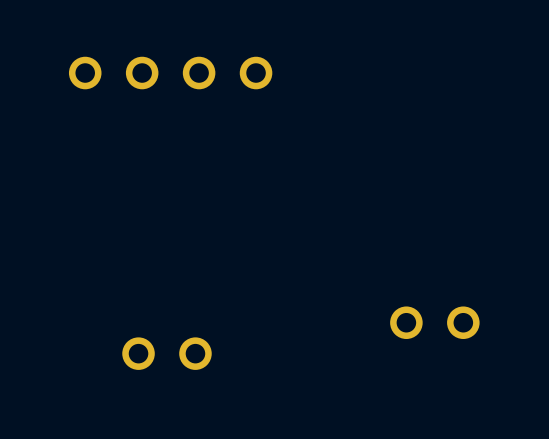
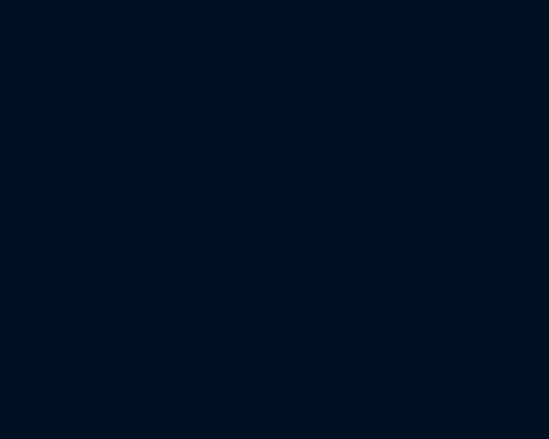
part: (170, 73) -> none
part: (434, 322) -> none
part: (166, 353) -> none

